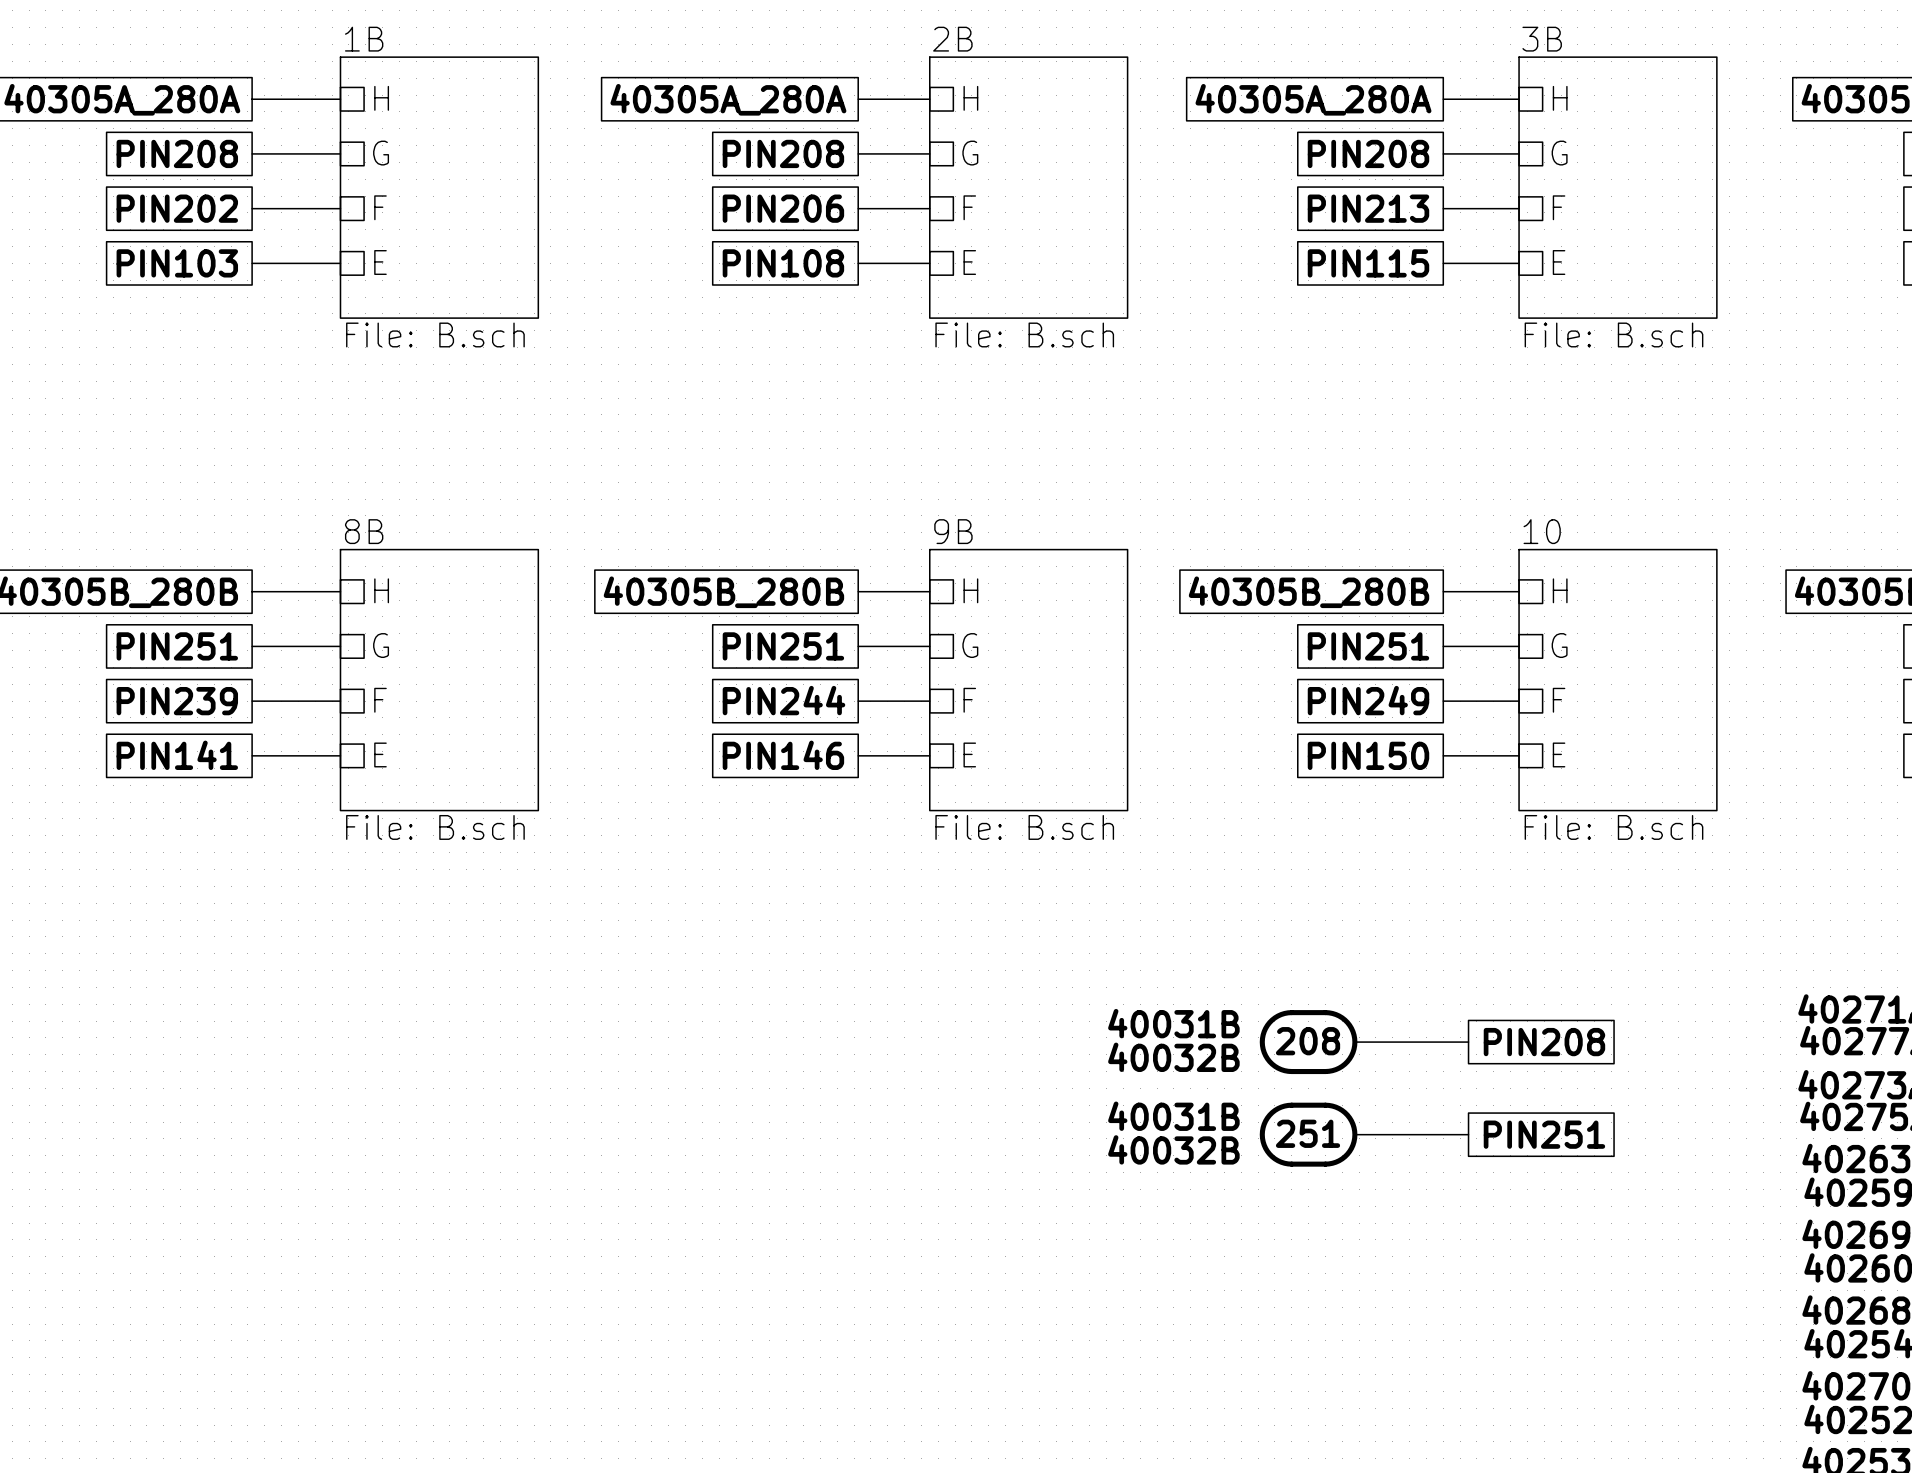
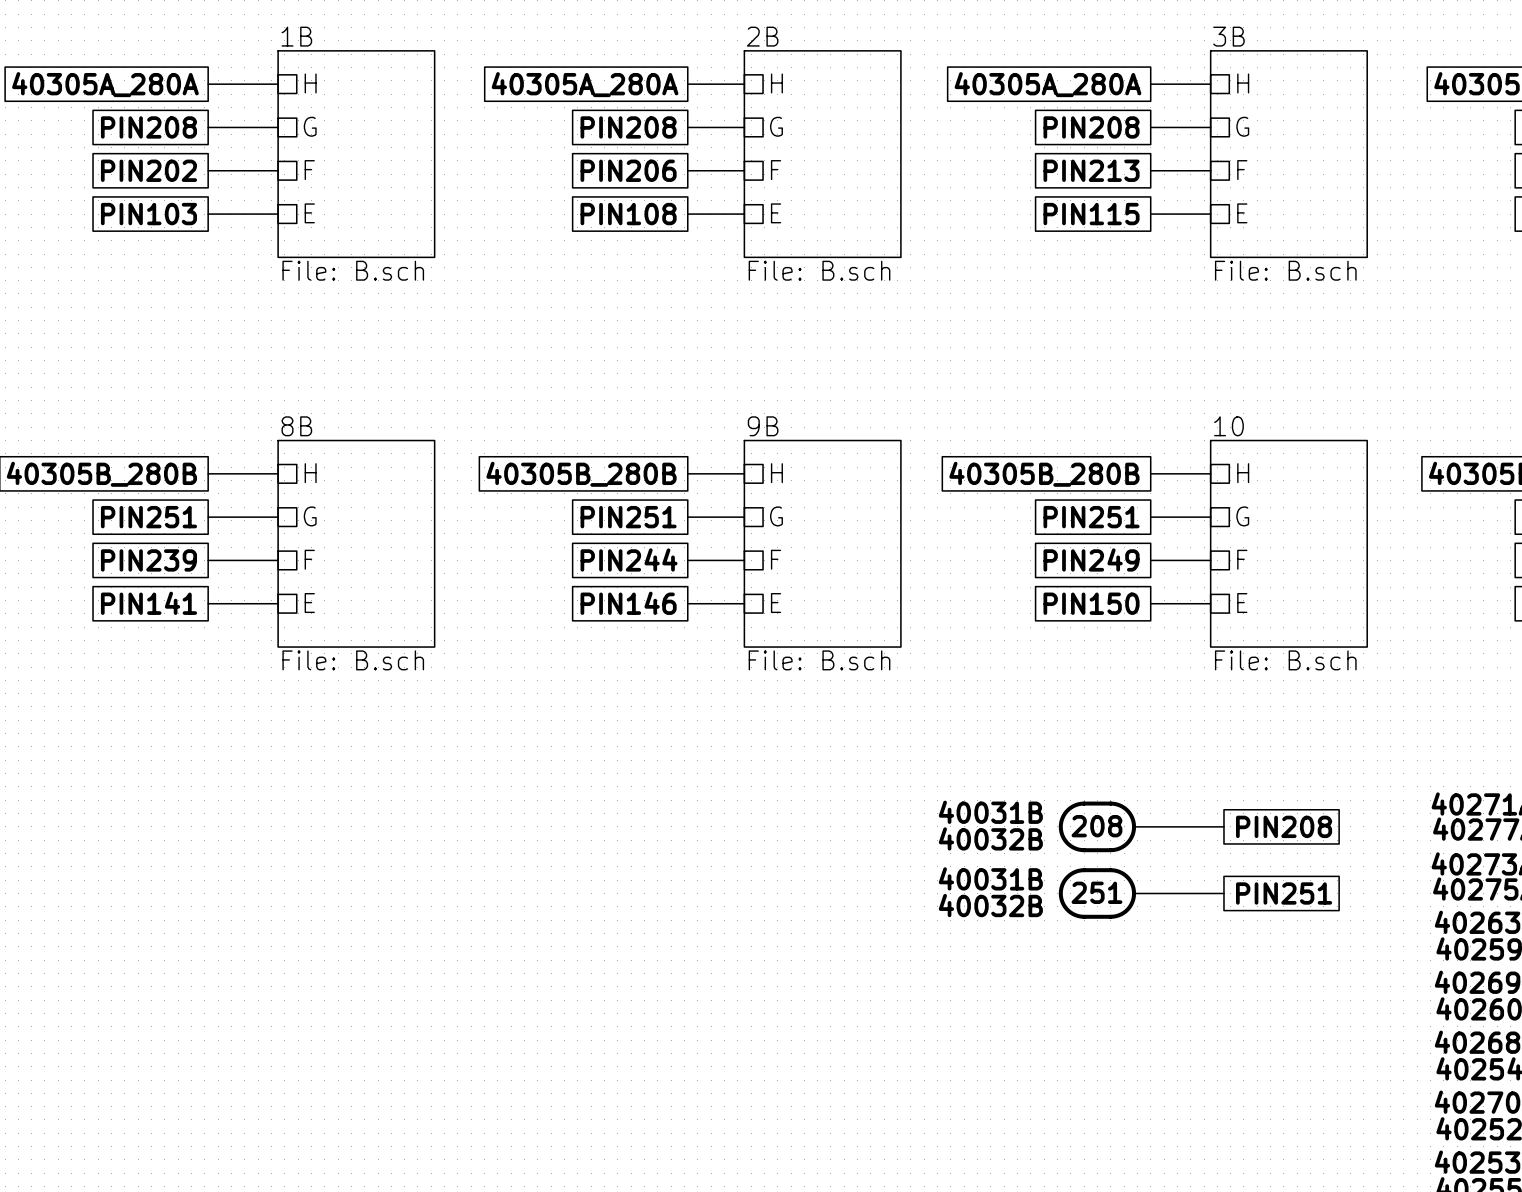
part position: (1308, 1042) -> (1097, 826)
wire: (1354, 1042) (1468, 1042) -> (1134, 826) (1223, 826)
global label position: PIN208 (1544, 1042) -> PIN208 (1284, 826)
part position: (1308, 1134) -> (1097, 893)
wire: (1354, 1134) (1468, 1134) -> (1134, 893) (1223, 893)
global label position: PIN251 (1544, 1134) -> PIN251 (1284, 893)

